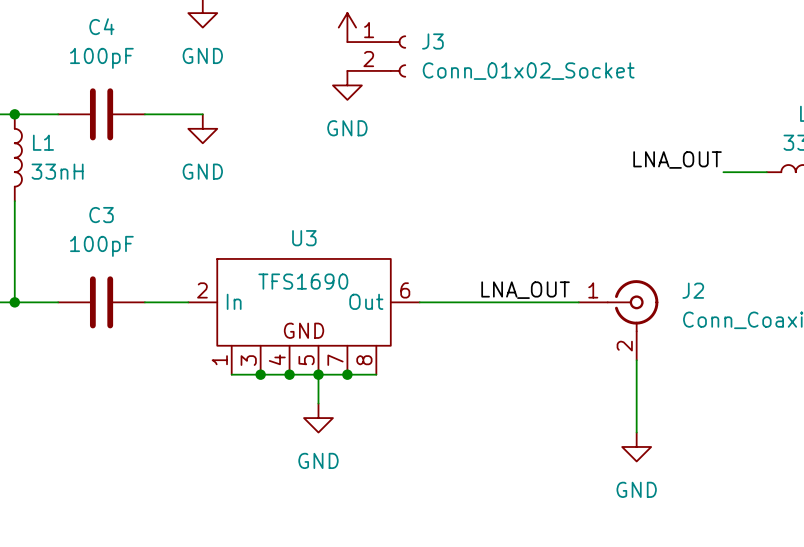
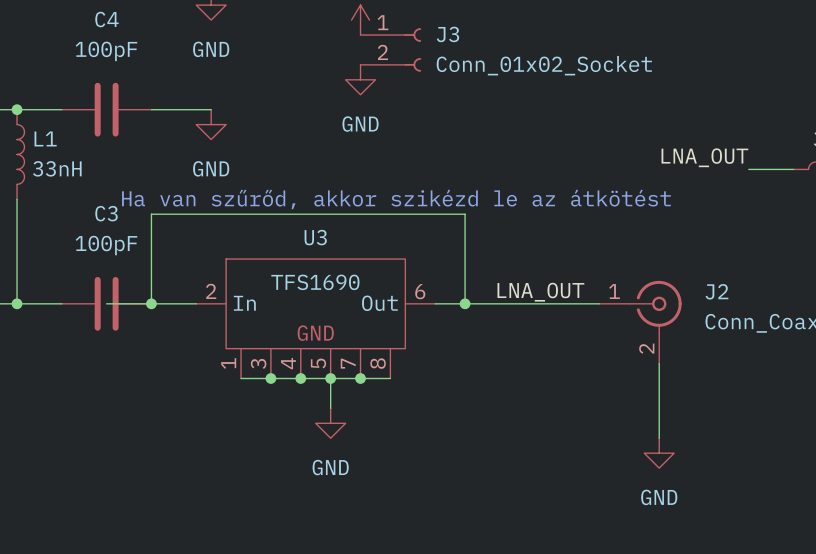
text: none -> Ha van szűrőd, akkor szikézd le az átkötést (396, 199)
wire: none -> (106, 303) (151, 303) (151, 214) (465, 214) (465, 303)
junction: none -> (151, 303)
junction: none -> (465, 303)

